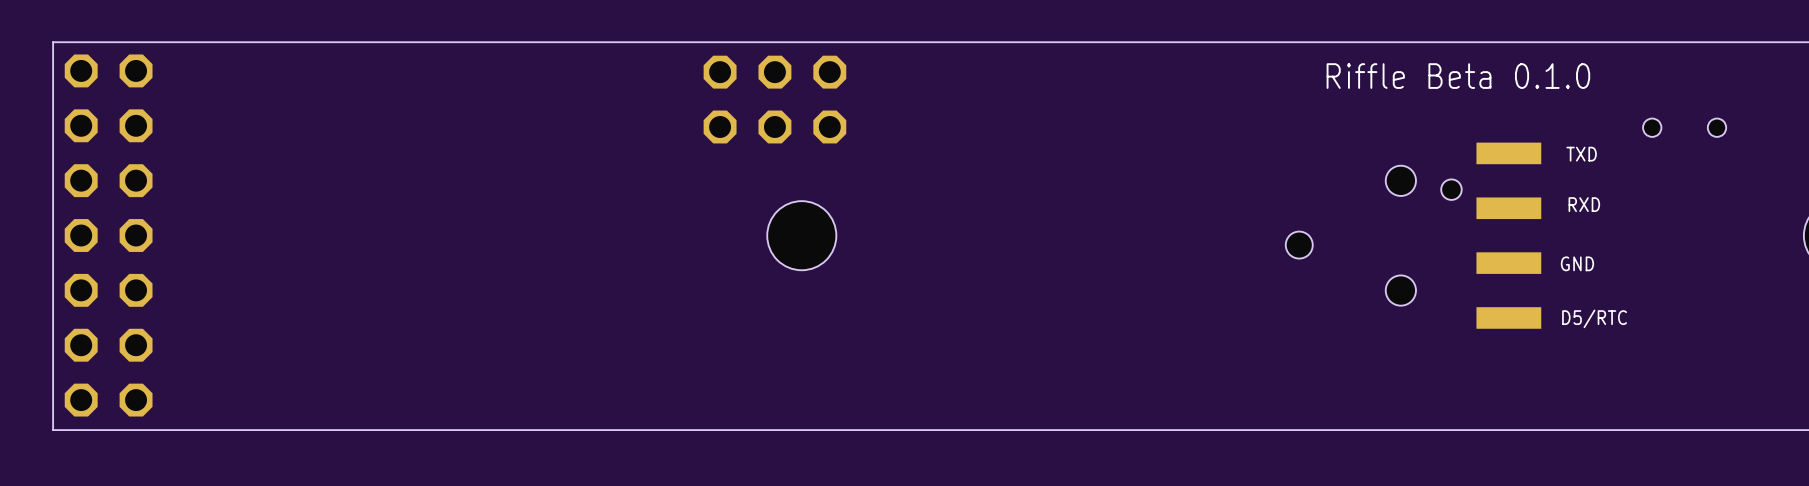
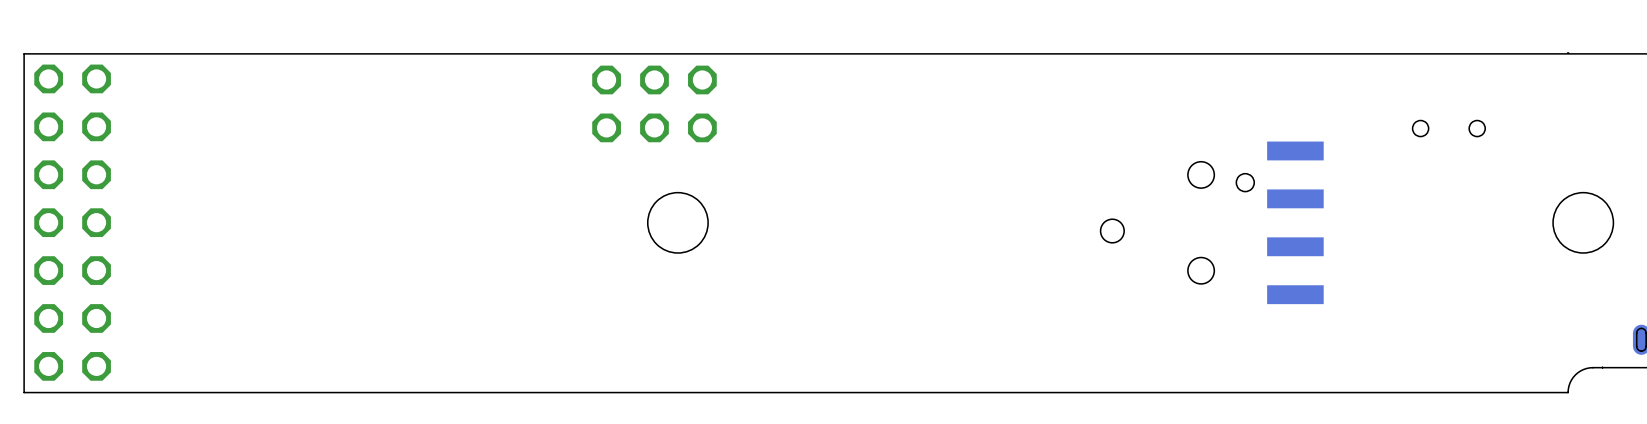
text: Riffle Beta 0.1.0 (1458, 76) -> none
text: TXD (1581, 154) -> none
text: RXD (1584, 204) -> none
text: GND (1577, 263) -> none
text: D5/RTC (1594, 318) -> none

